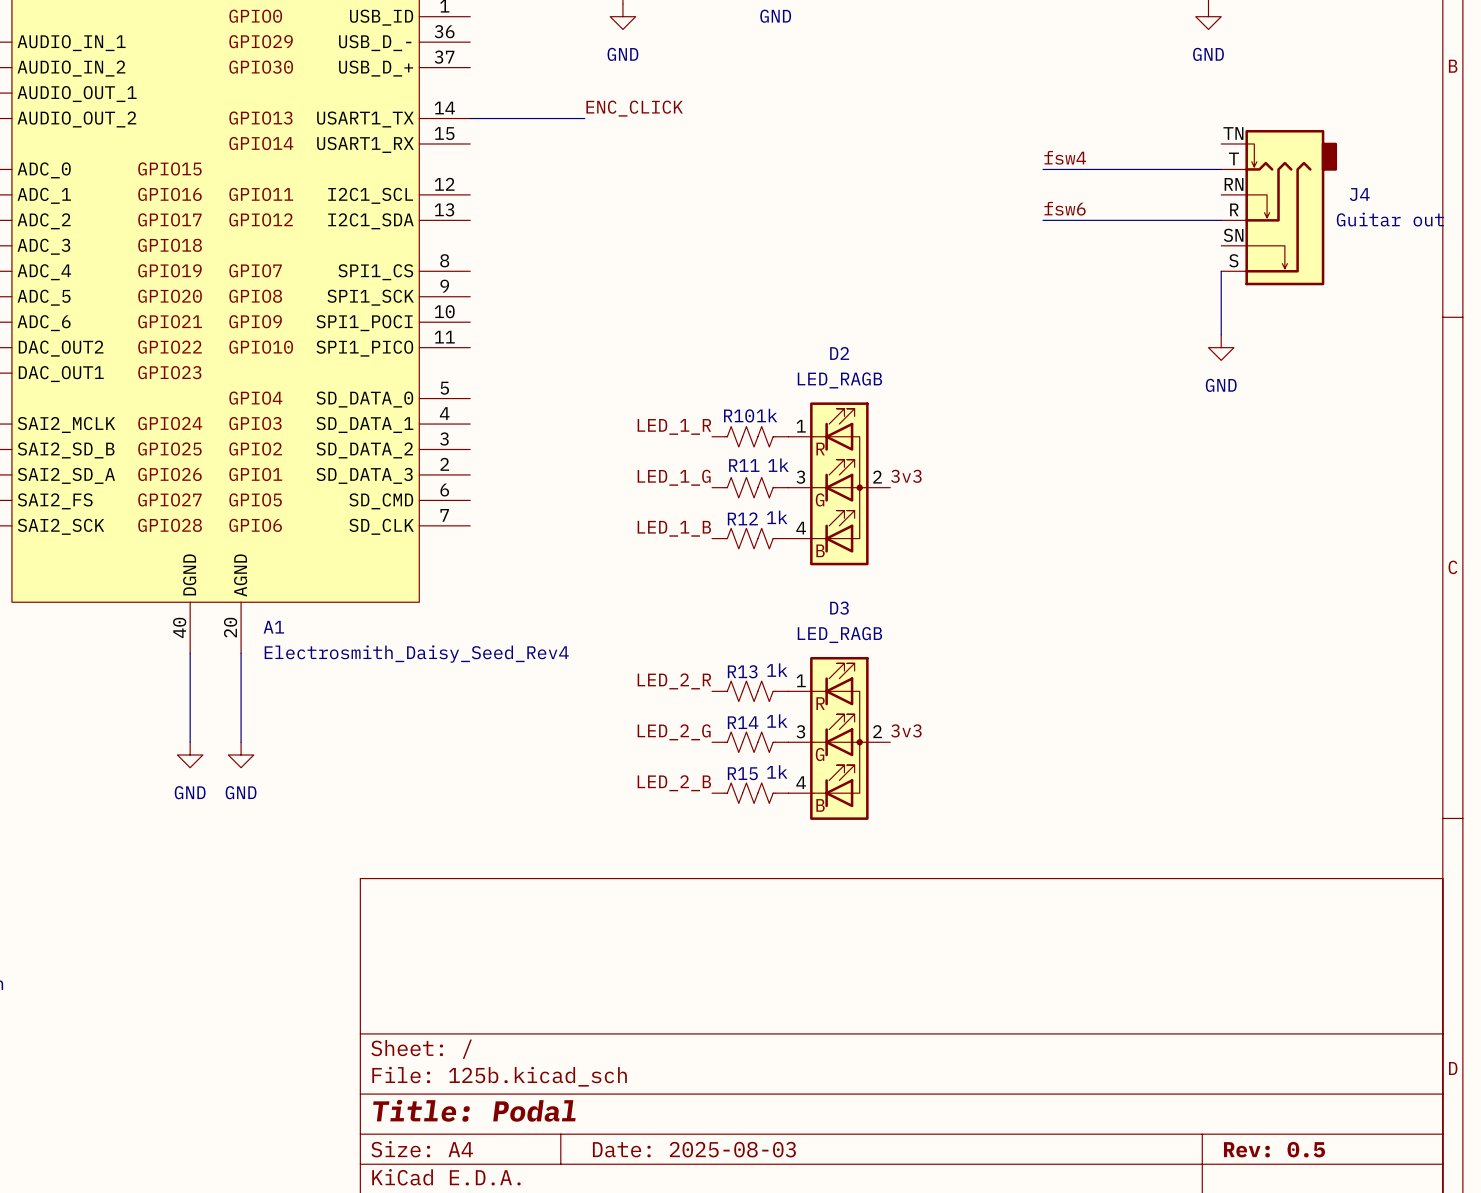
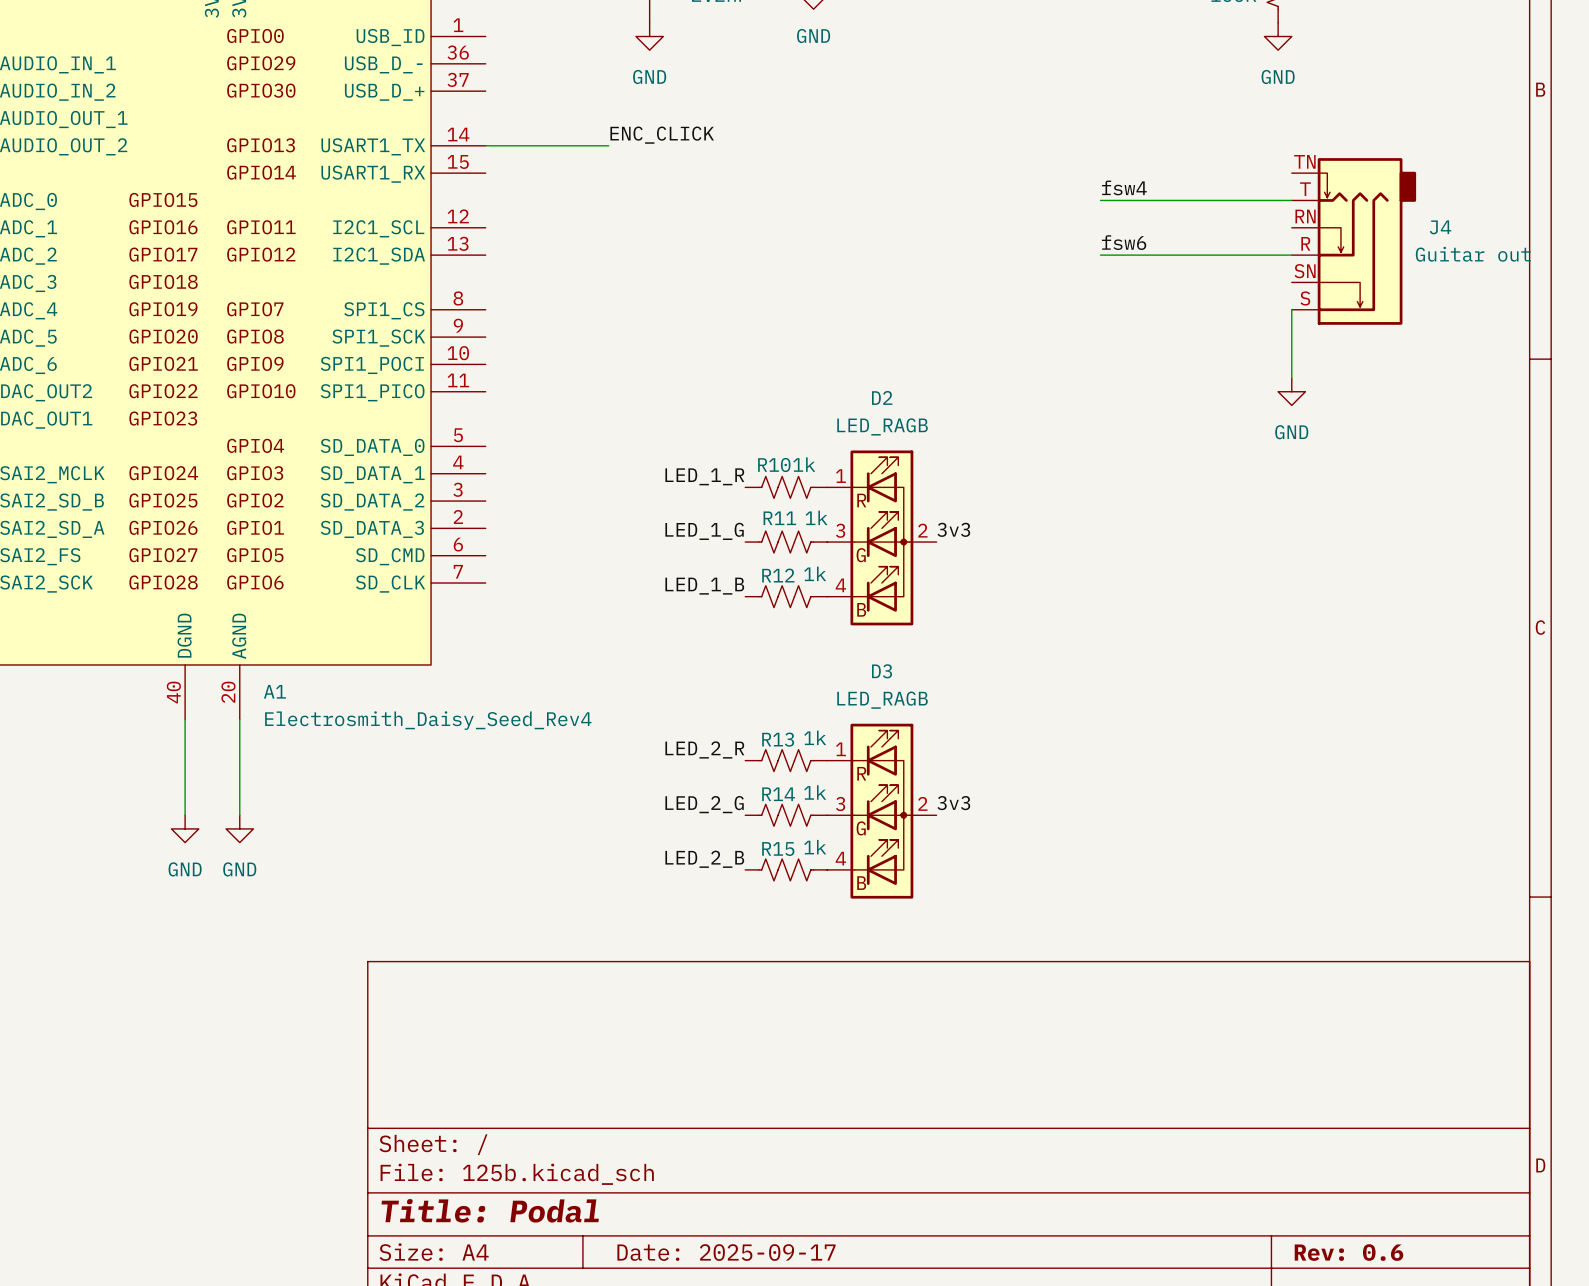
title block: Date: 2025-08-03 (694, 1149) -> Date: 2025-09-17 (726, 1252)
title block: Rev: 0.5 (1274, 1149) -> Rev: 0.6 (1348, 1252)

